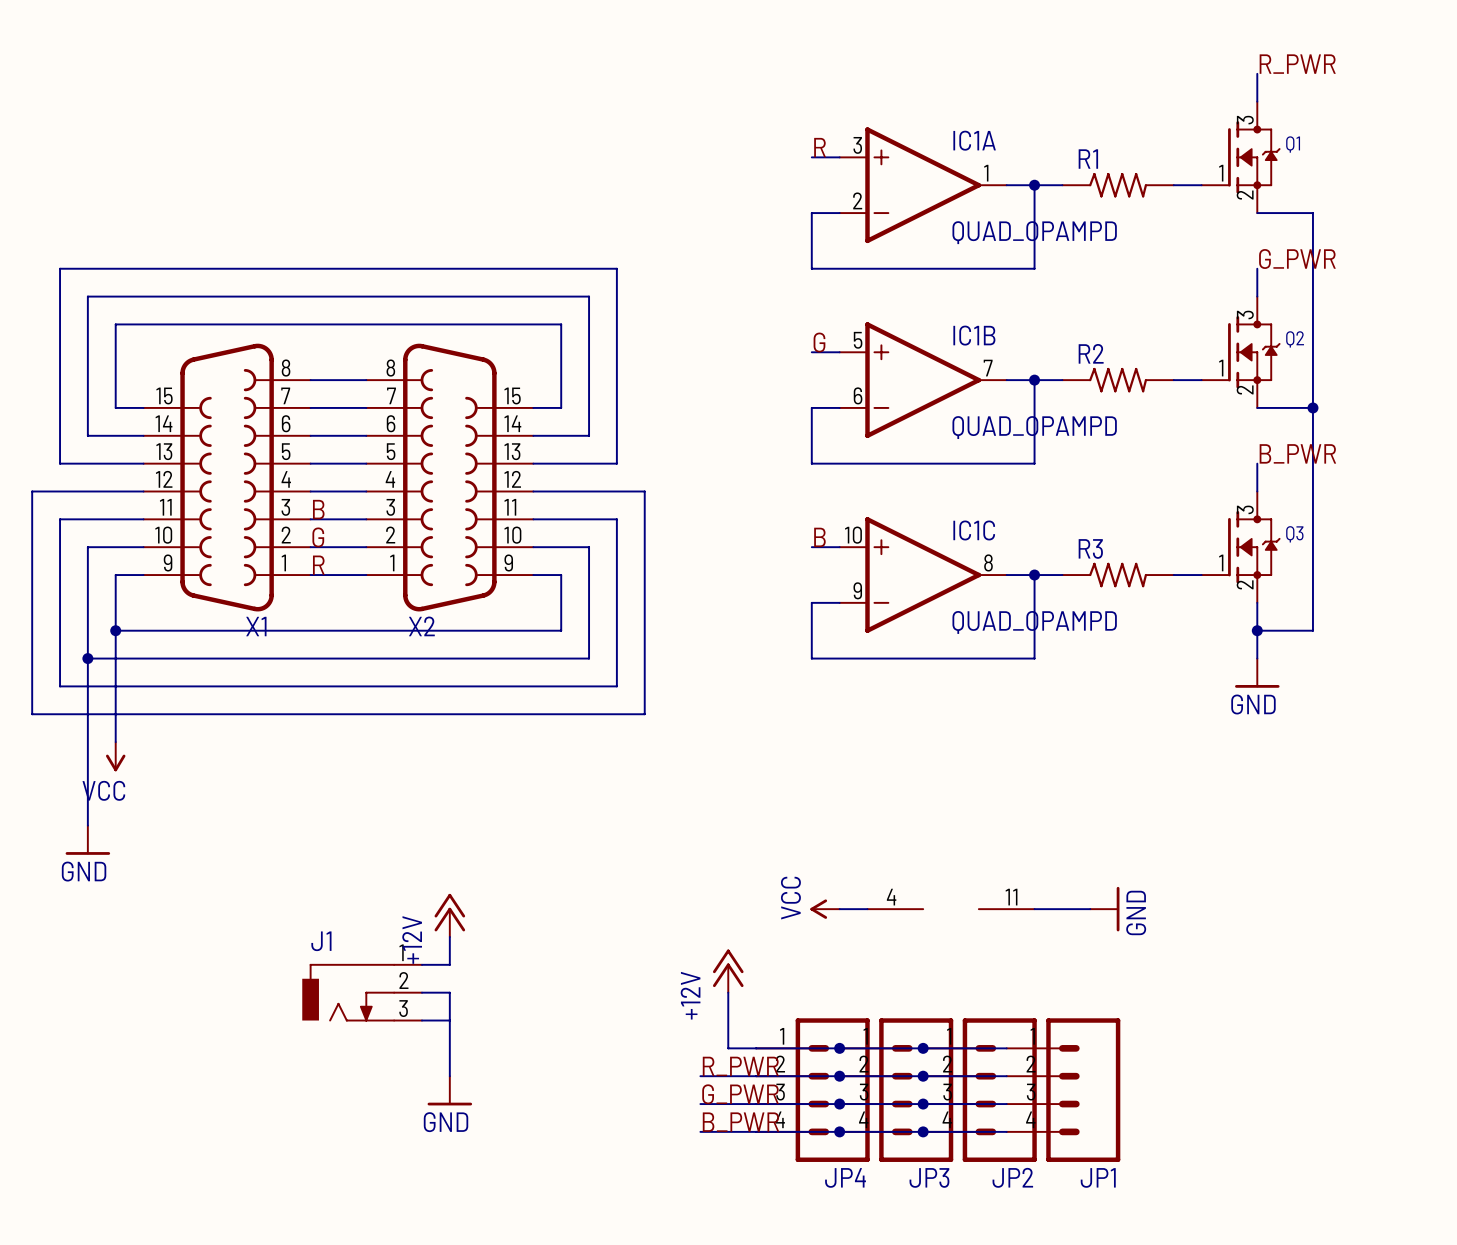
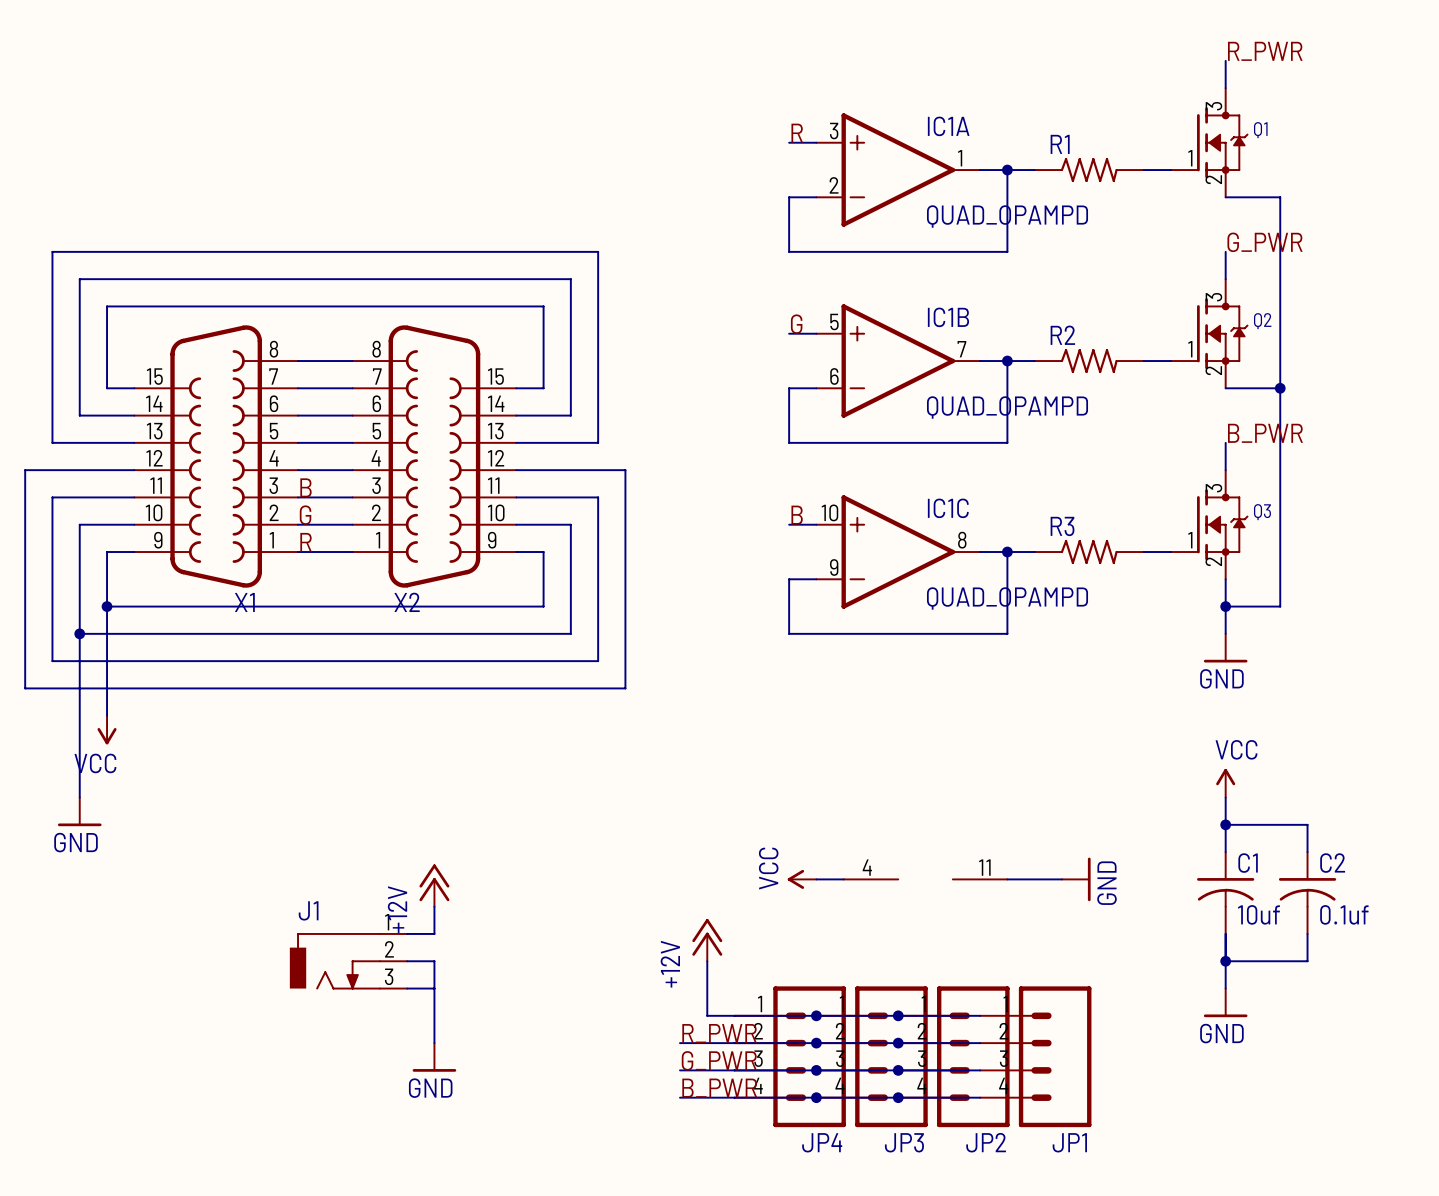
power symbol: none -> VCC (1225, 783)
wire: none -> (1225, 797) (1225, 852)
wire: none -> (1225, 824) (1307, 824) (1307, 852)
junction: none -> (1225, 824)
C1: none -> 10uf (1225, 893)
C2: none -> 0.1uf (1307, 893)
wire: none -> (1225, 933) (1225, 988)
wire: none -> (1307, 933) (1307, 961) (1225, 961)
junction: none -> (1225, 961)
power symbol: none -> GND (1225, 1002)

